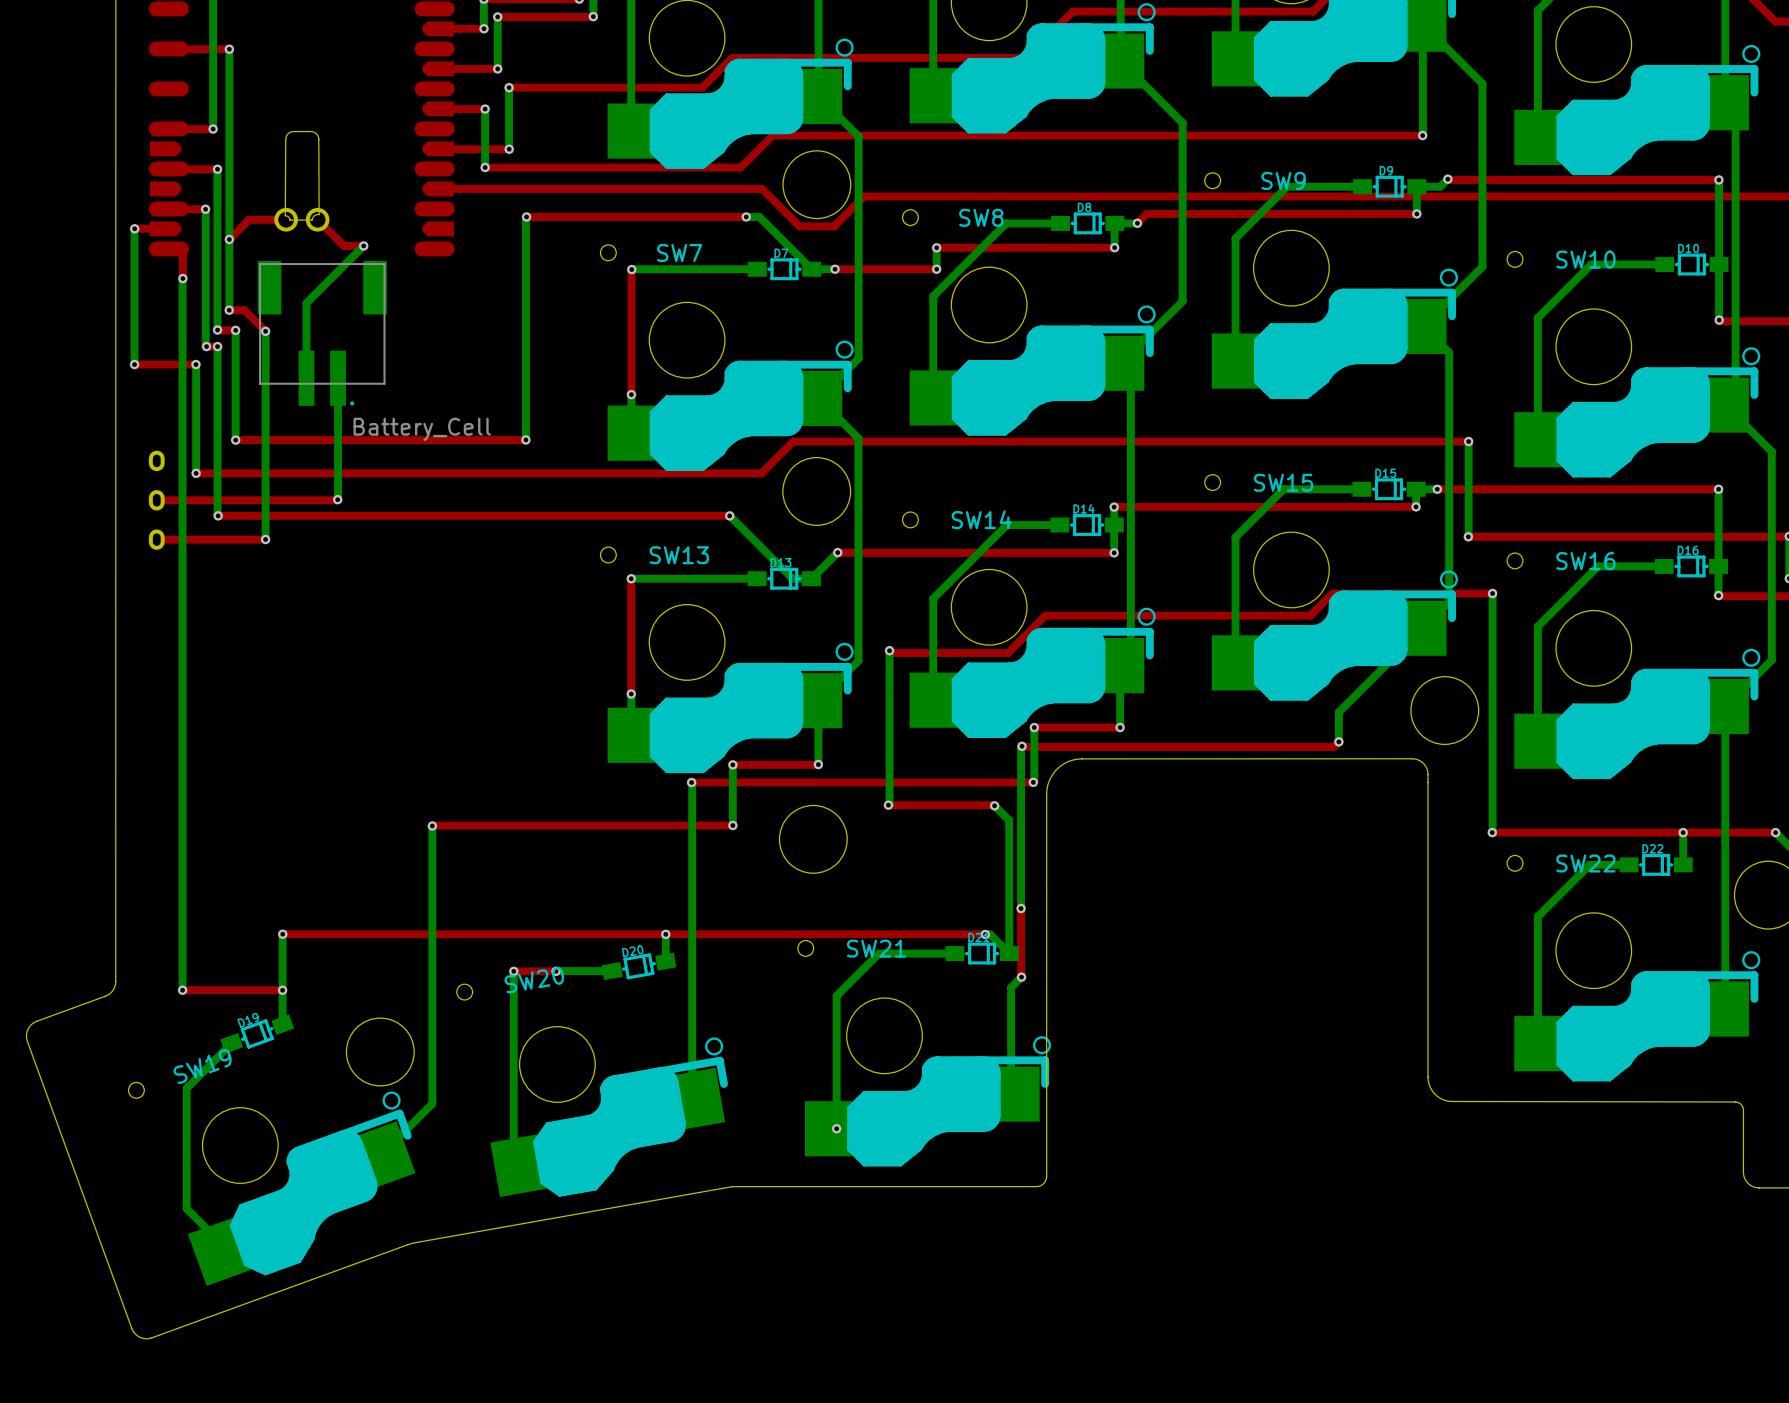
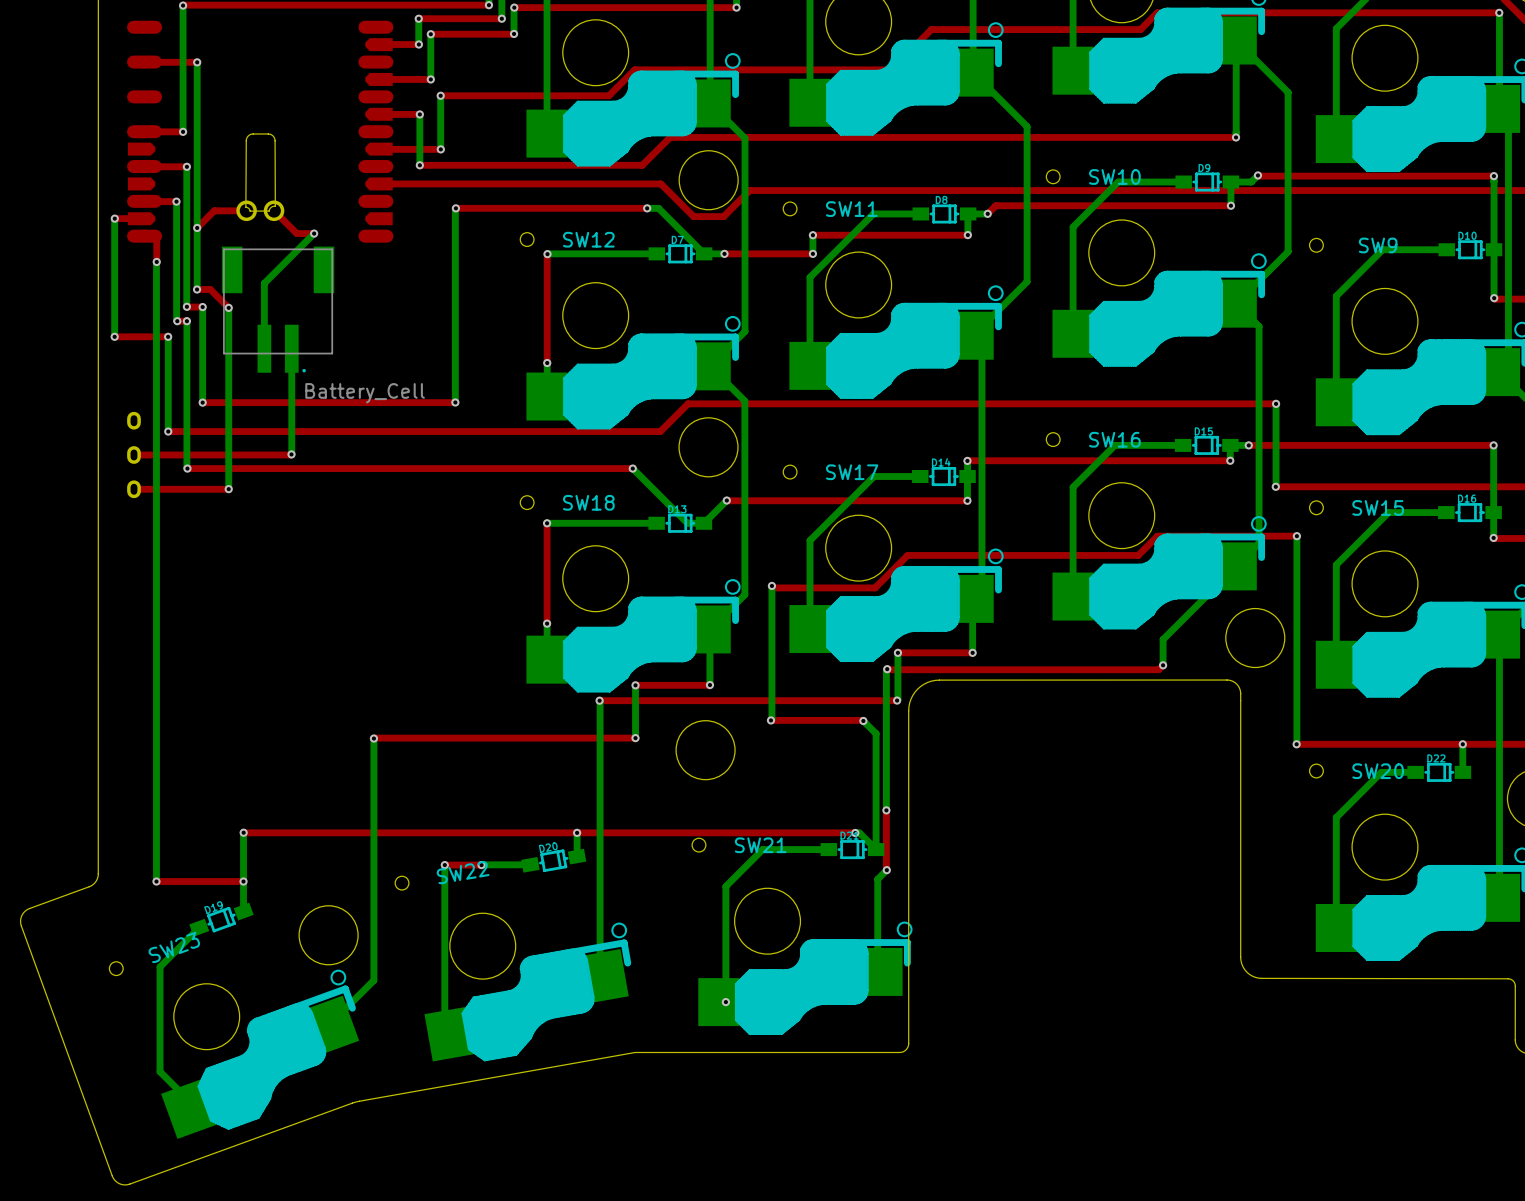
SW9 name: SW9 (1283, 180) -> SW10 (1114, 176)
SW8 name: SW8 (981, 217) -> SW11 (851, 209)
SW7 name: SW7 (679, 252) -> SW12 (588, 239)
SW10 name: SW10 (1585, 259) -> SW9 (1378, 245)
SW15 name: SW15 (1283, 482) -> SW16 (1114, 439)
SW14 name: SW14 (981, 519) -> SW17 (852, 472)
SW13 name: SW13 (679, 555) -> SW18 (588, 502)
SW16 name: SW16 (1585, 561) -> SW15 (1378, 507)
SW22 name: SW22 (1585, 863) -> SW20 (1378, 771)
SW20 name: SW20 (534, 980) -> SW22 (463, 872)
SW19 name: SW19 (202, 1066) -> SW23 (174, 947)

